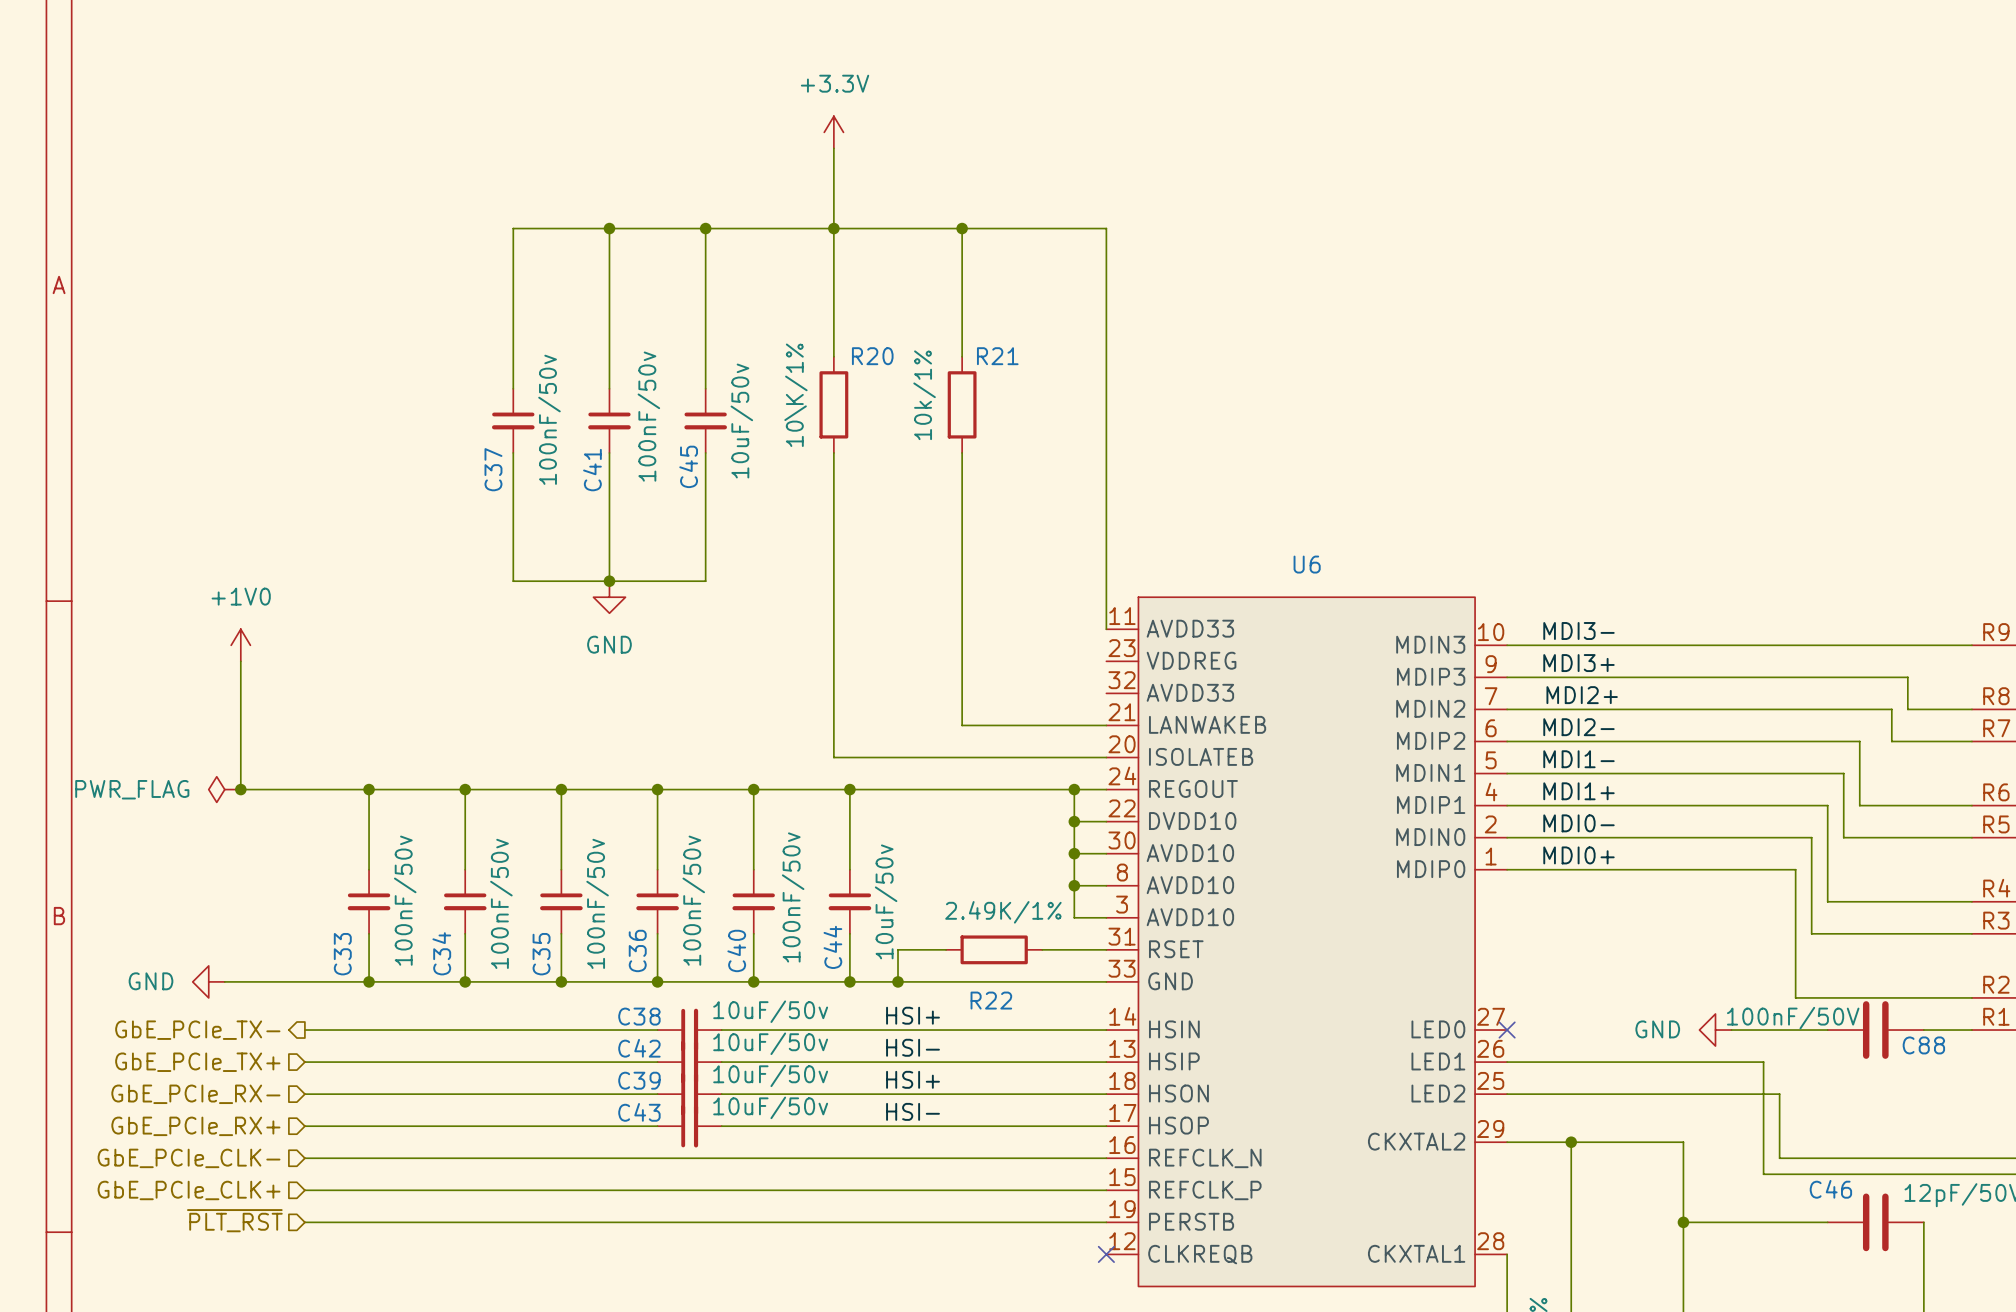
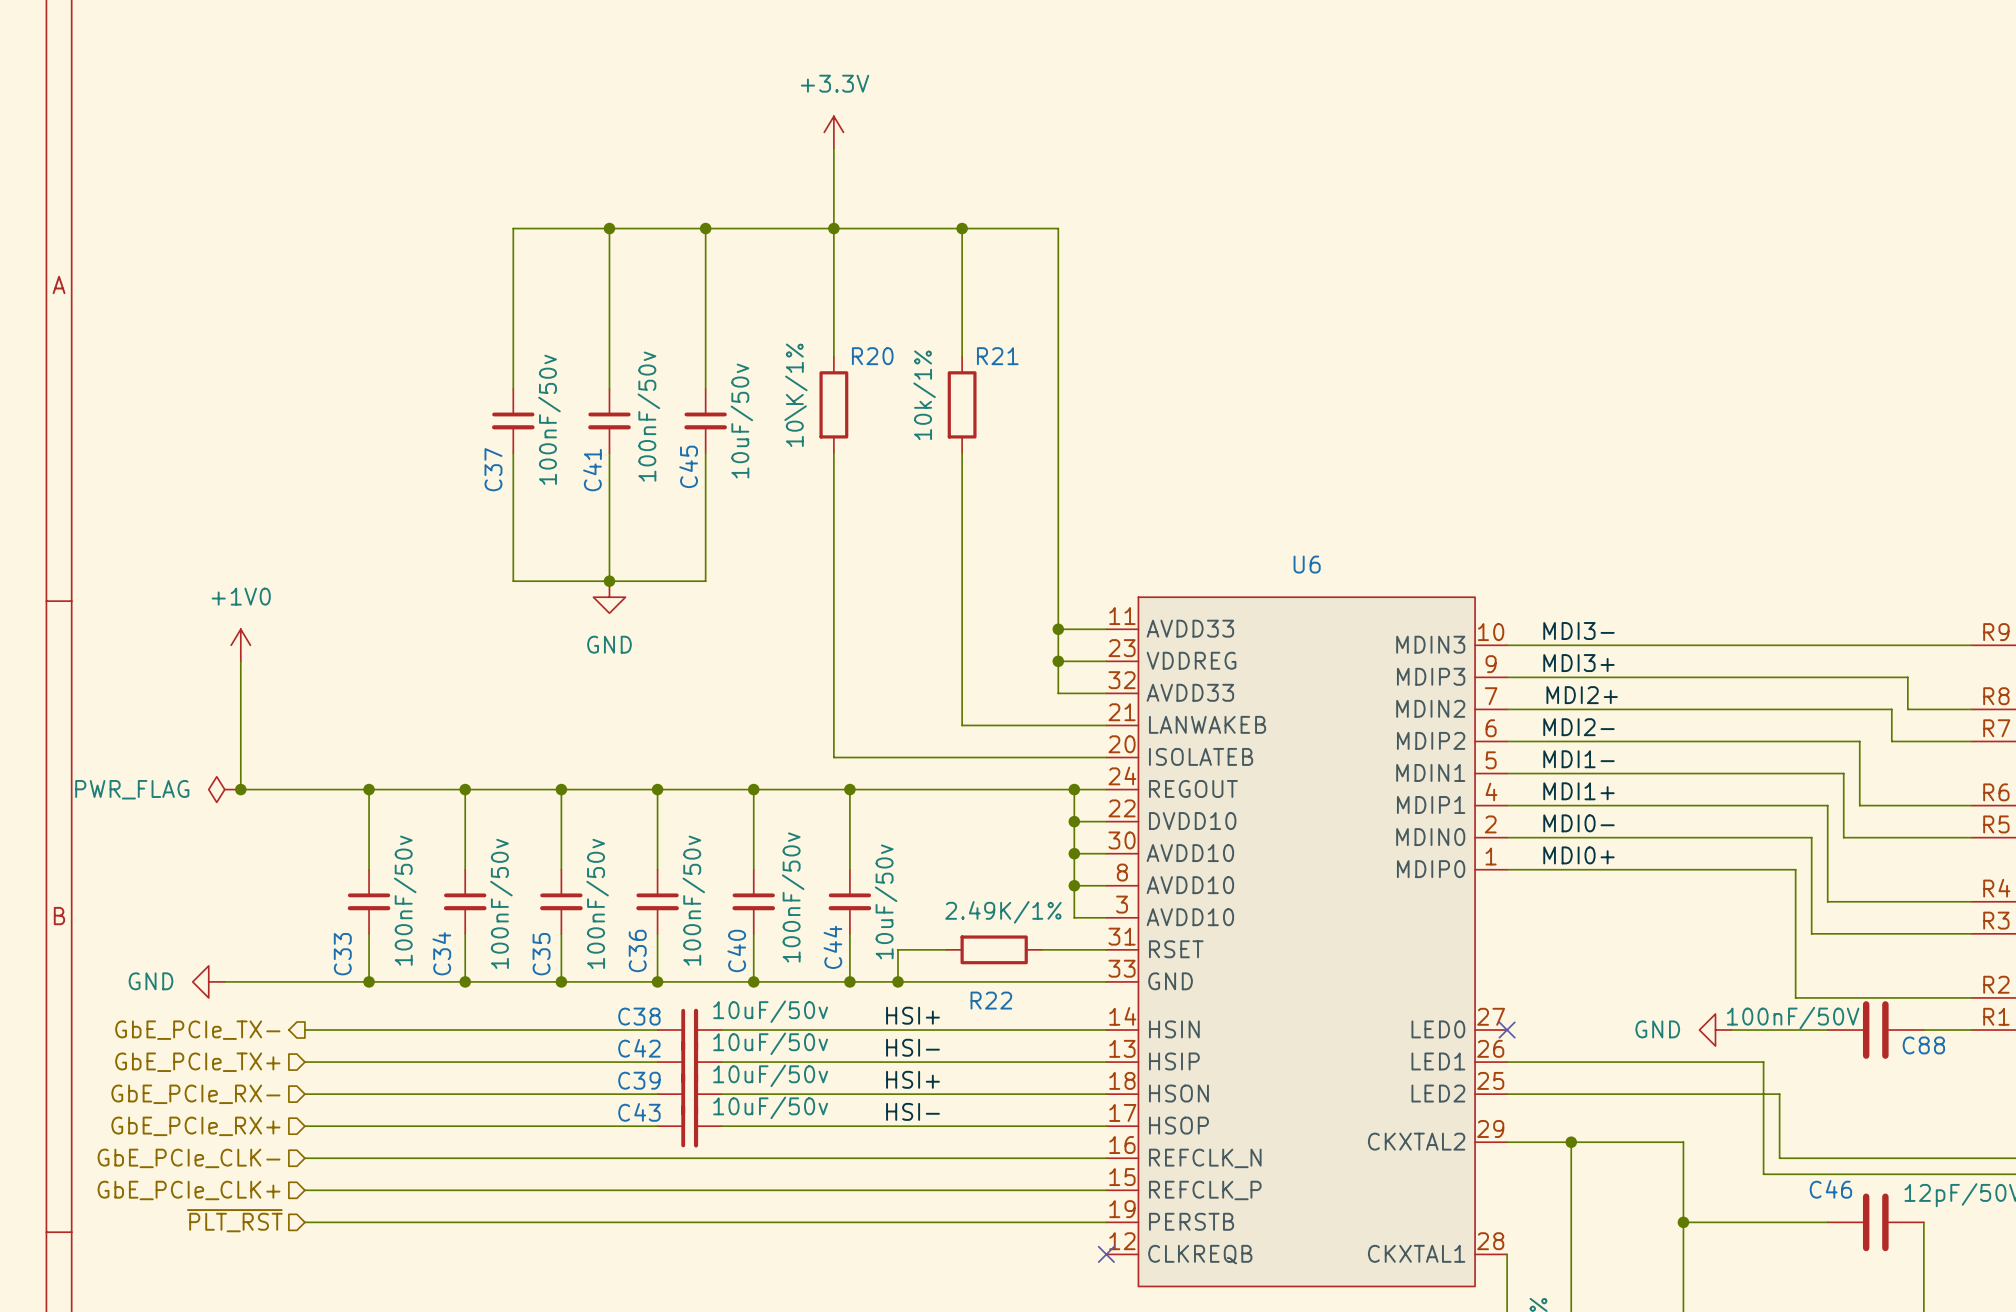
wire: (1058, 228) (1106, 228) (1106, 629) -> (1058, 228) (1058, 693) (1106, 693)
wire: none -> (1058, 629) (1106, 629)
junction: none -> (1058, 629)
wire: none -> (1058, 661) (1106, 661)
junction: none -> (1058, 661)

